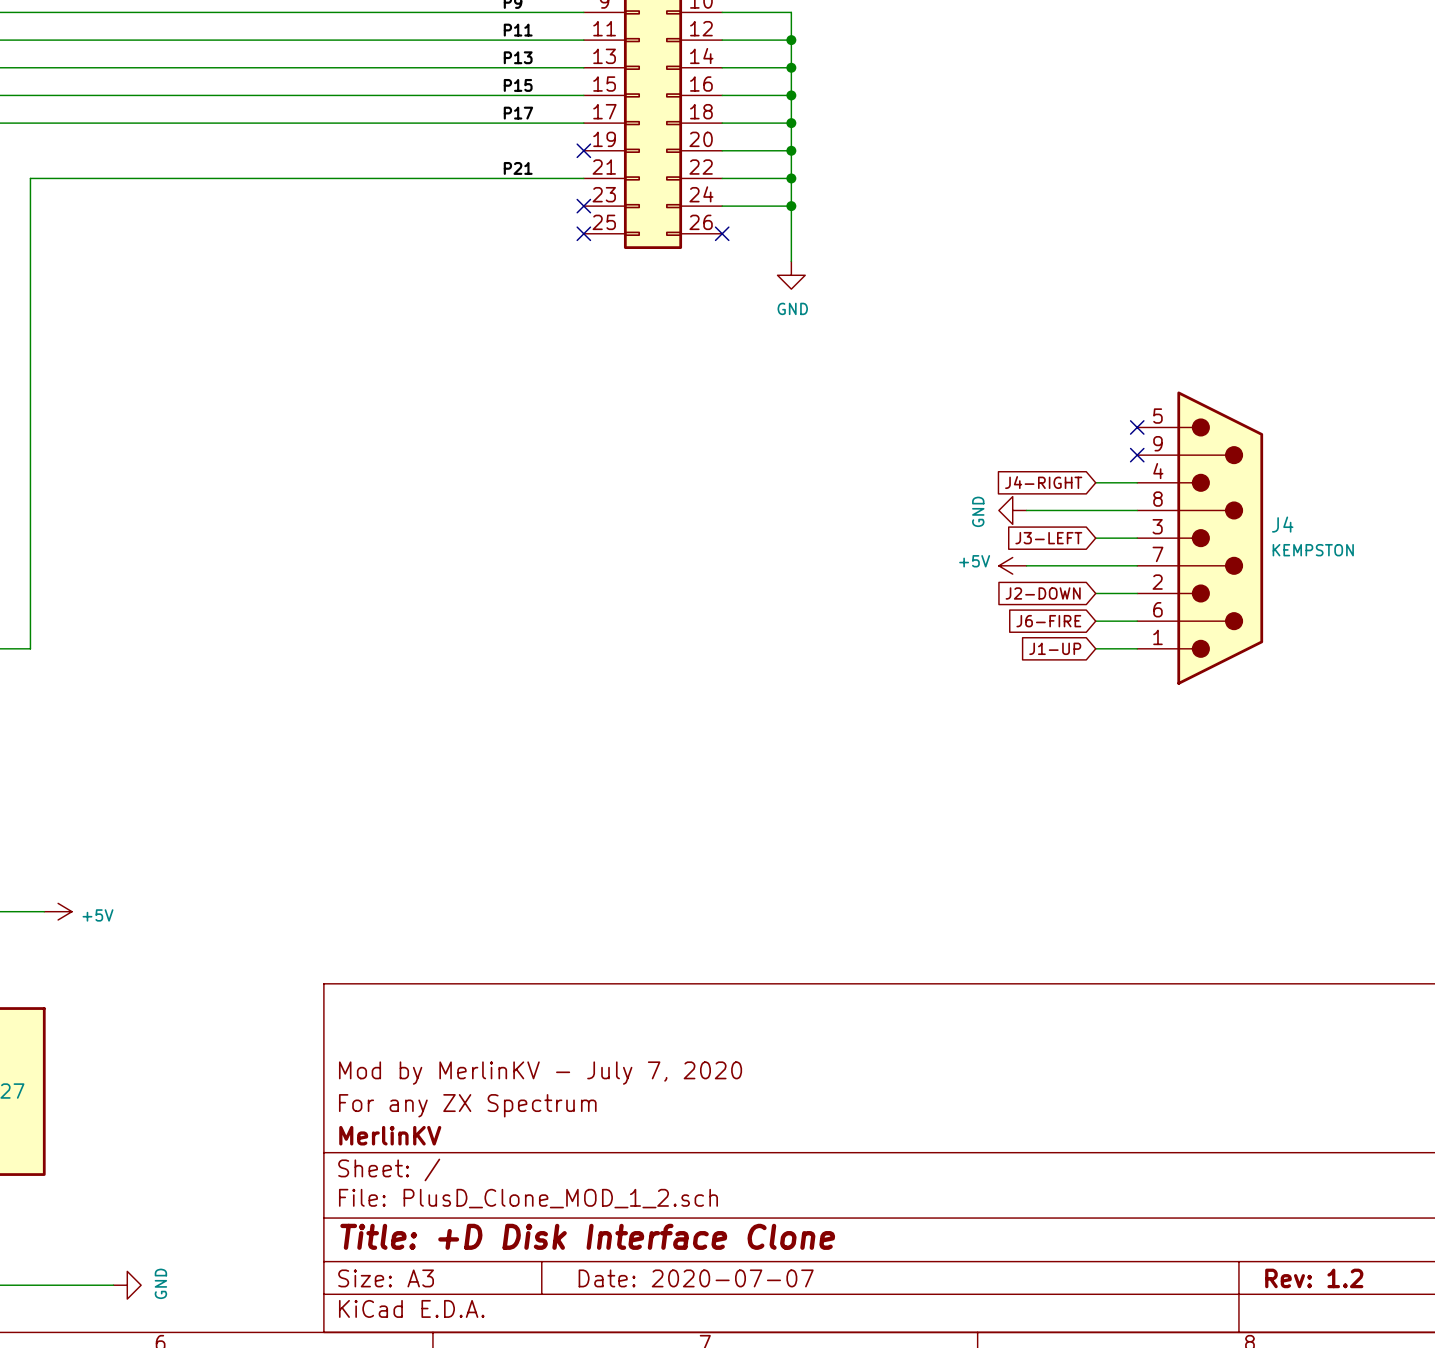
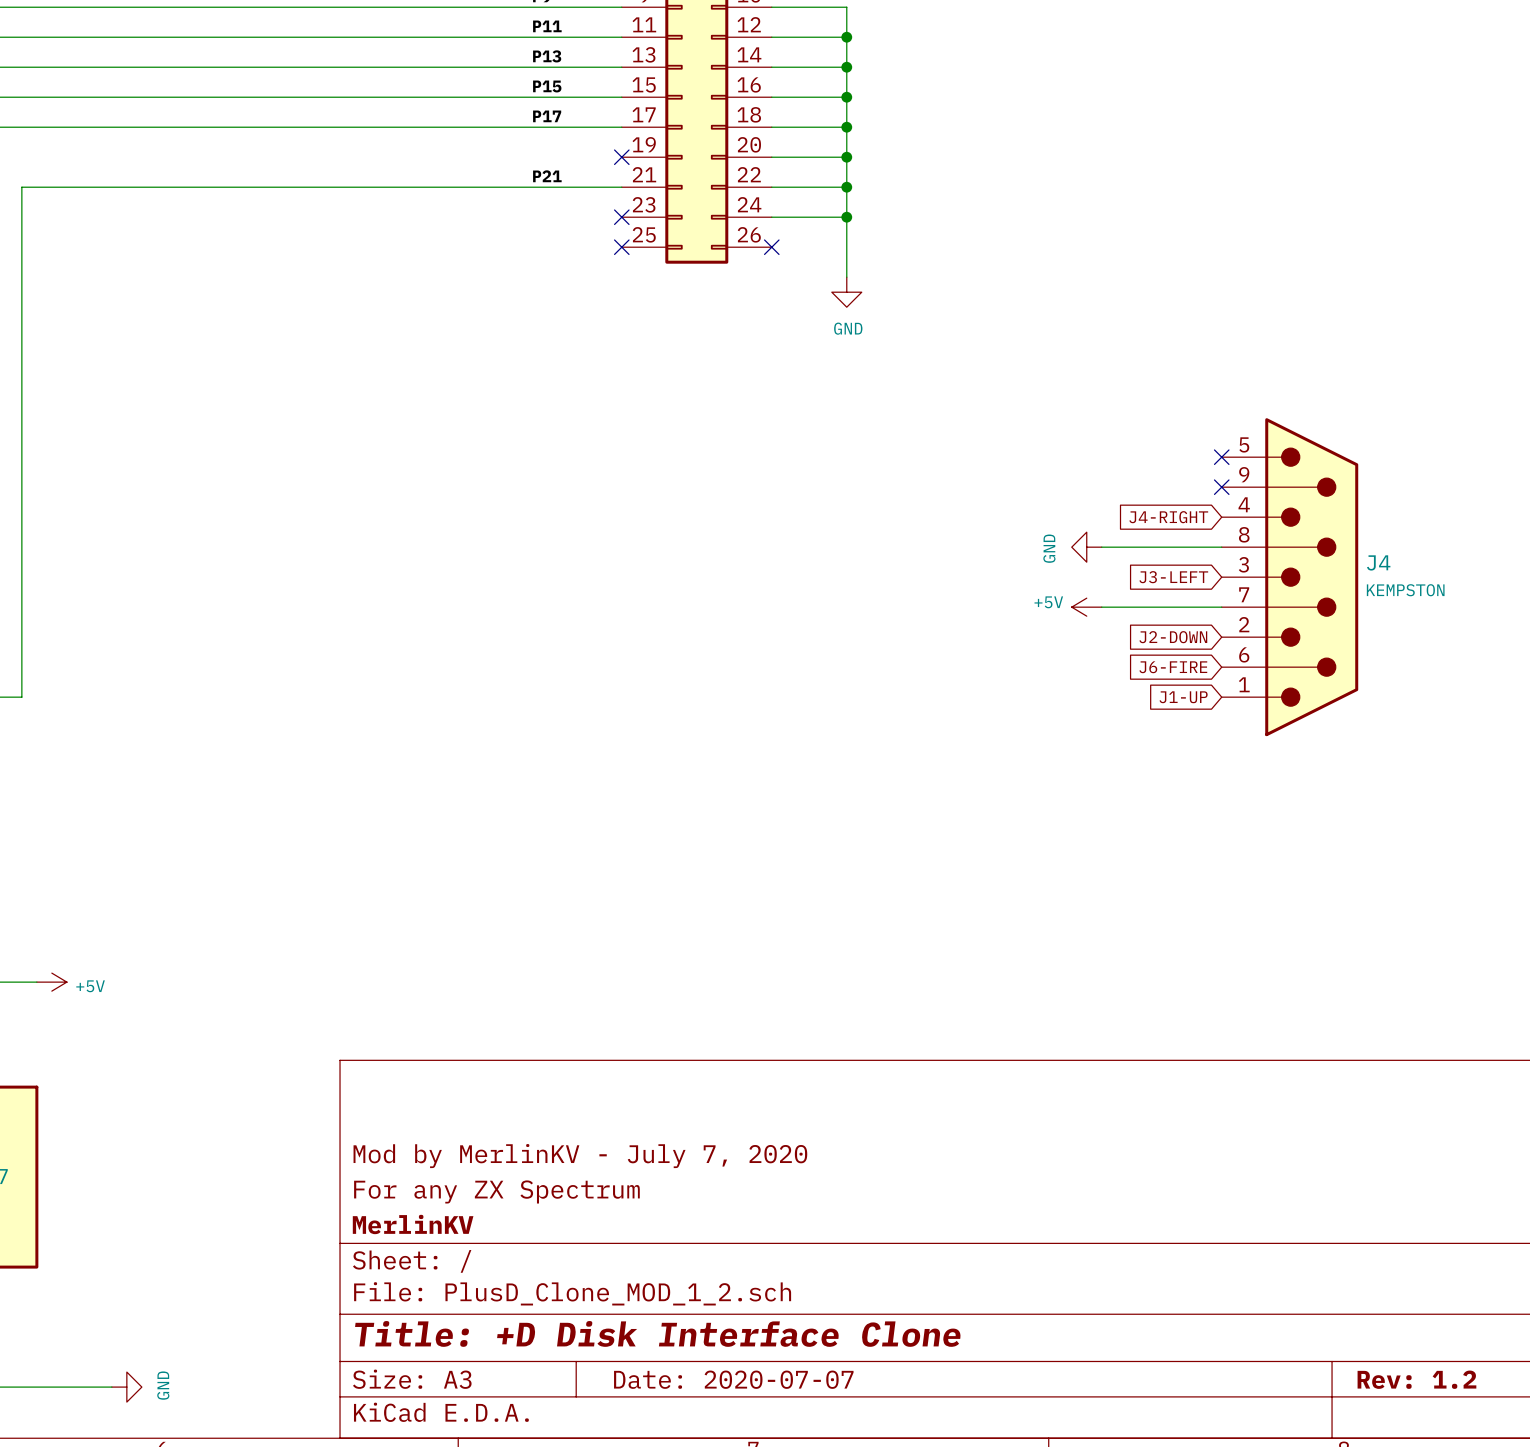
global label position: J4-RIGHT (1043, 482) -> J4-RIGHT (1168, 517)
wire: (1095, 482) (1137, 482) -> none
global label position: J3-LEFT (1048, 538) -> J3-LEFT (1173, 577)
wire: (1095, 538) (1137, 538) -> none
global label position: J2-DOWN (1043, 593) -> J2-DOWN (1173, 637)
wire: (1095, 593) (1137, 593) -> none
global label position: J6-FIRE (1048, 621) -> J6-FIRE (1173, 667)
wire: (1095, 621) (1137, 621) -> none
global label position: J1-UP (1055, 648) -> J1-UP (1183, 697)
wire: (1095, 648) (1137, 648) -> none

